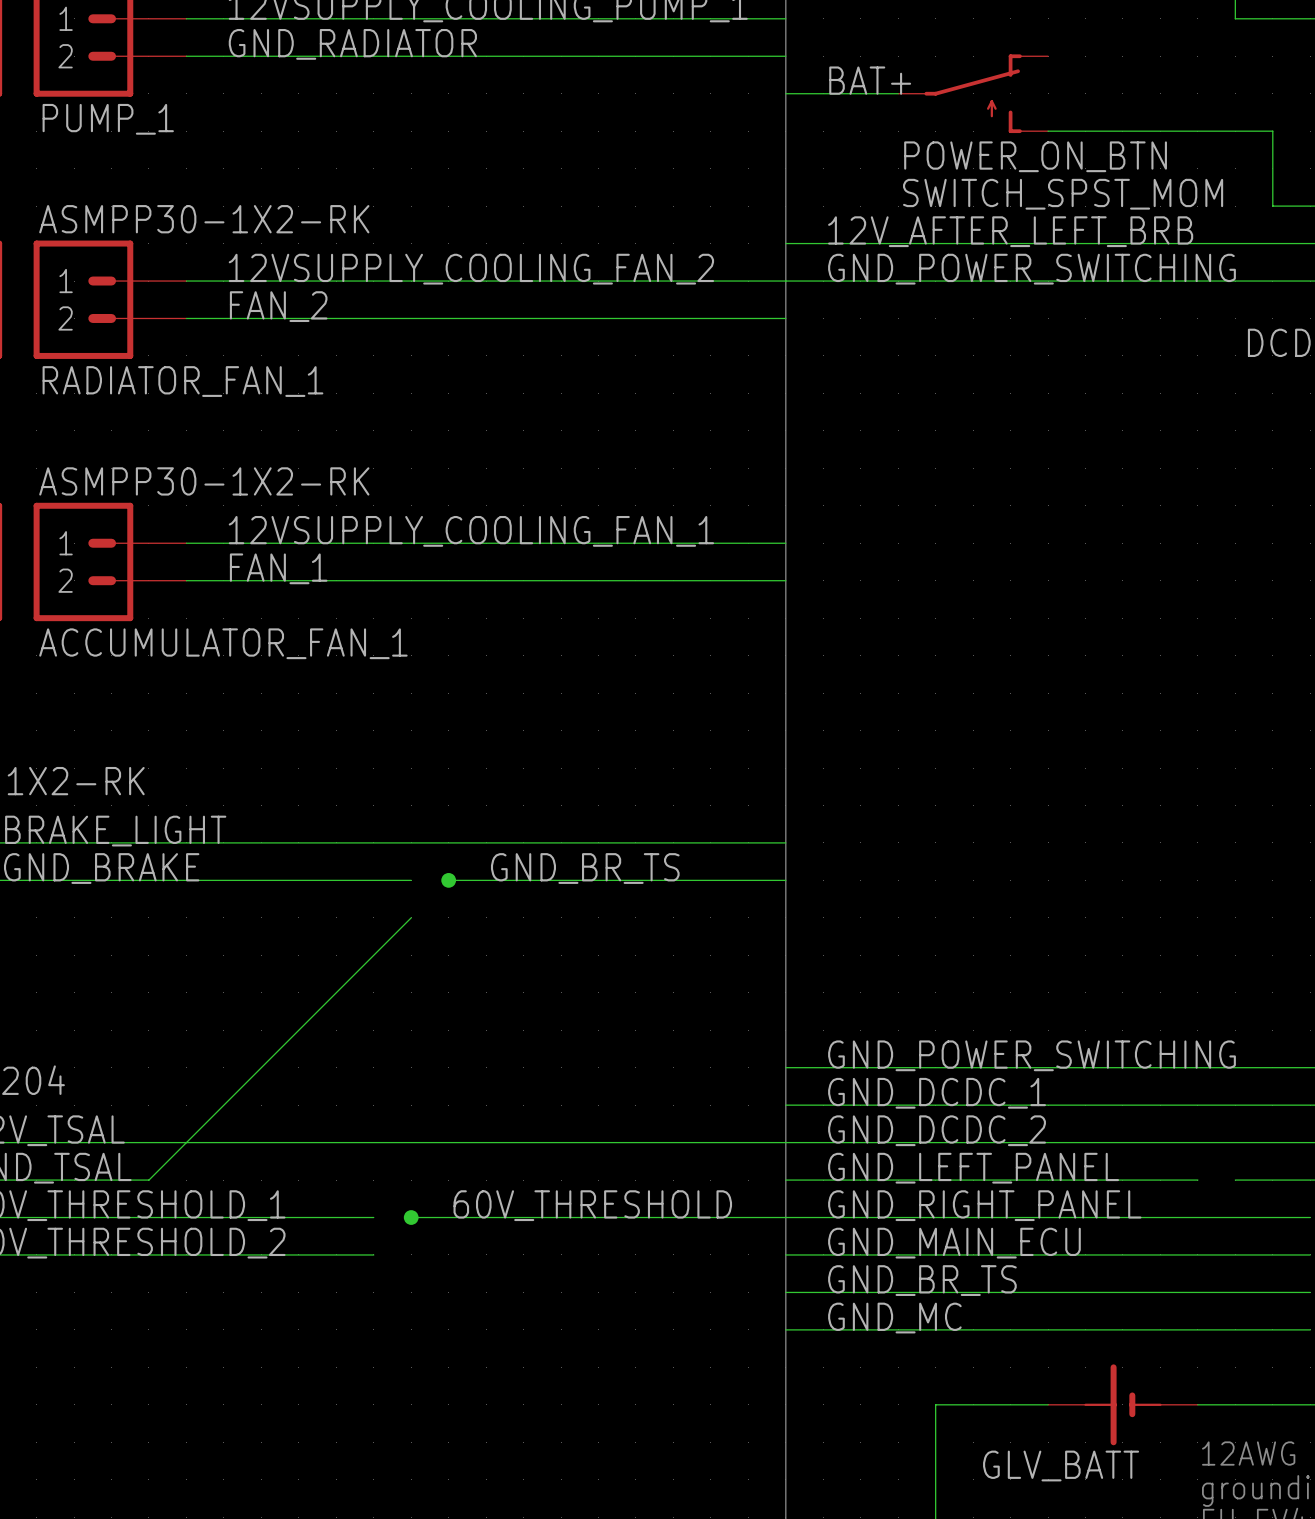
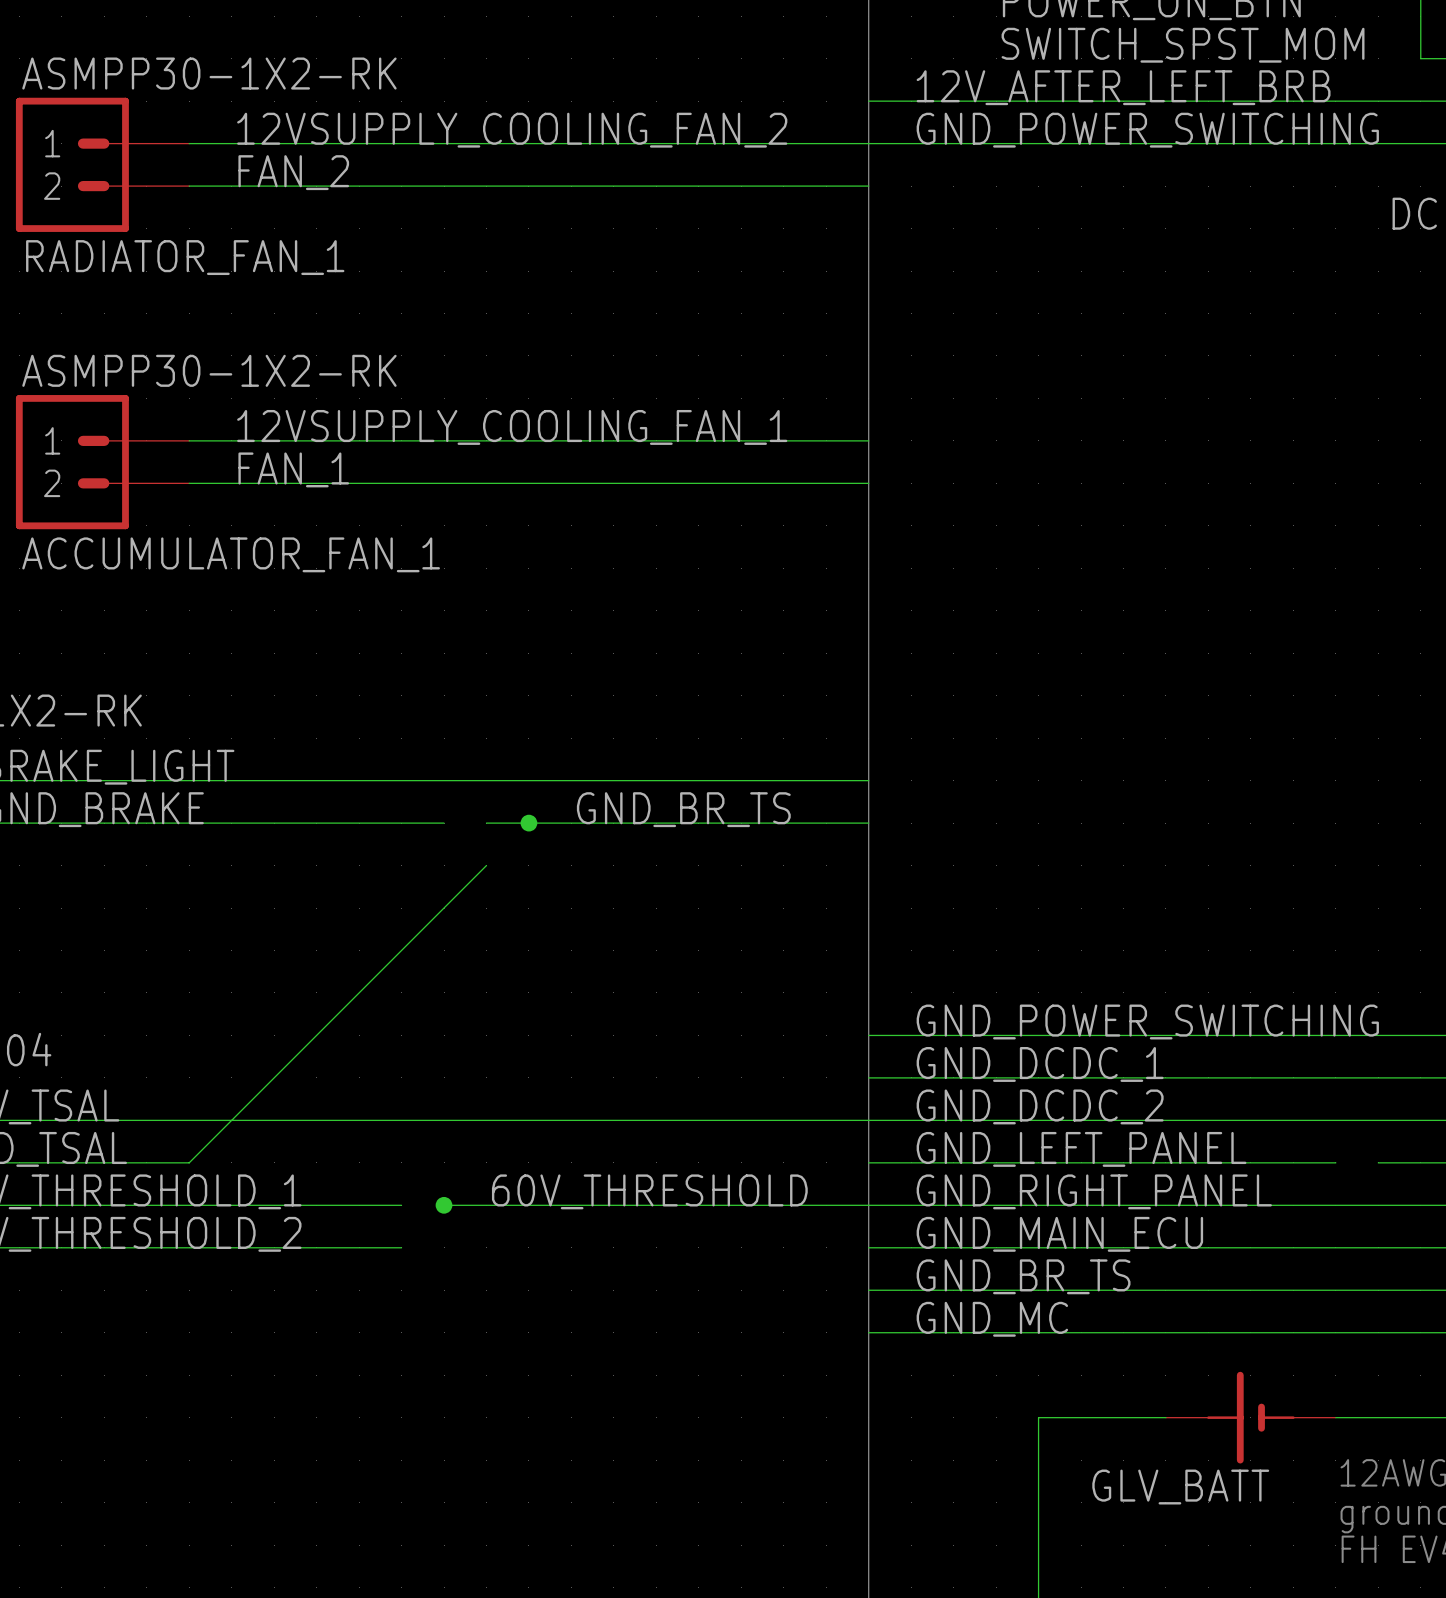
label position: GND_BR_TS (585, 868) -> GND_BR_TS (683, 809)
junction position: (448, 880) -> (528, 823)
wire: (411, 917) (148, 1180) -> (486, 865) (189, 1162) (146, 1162)

